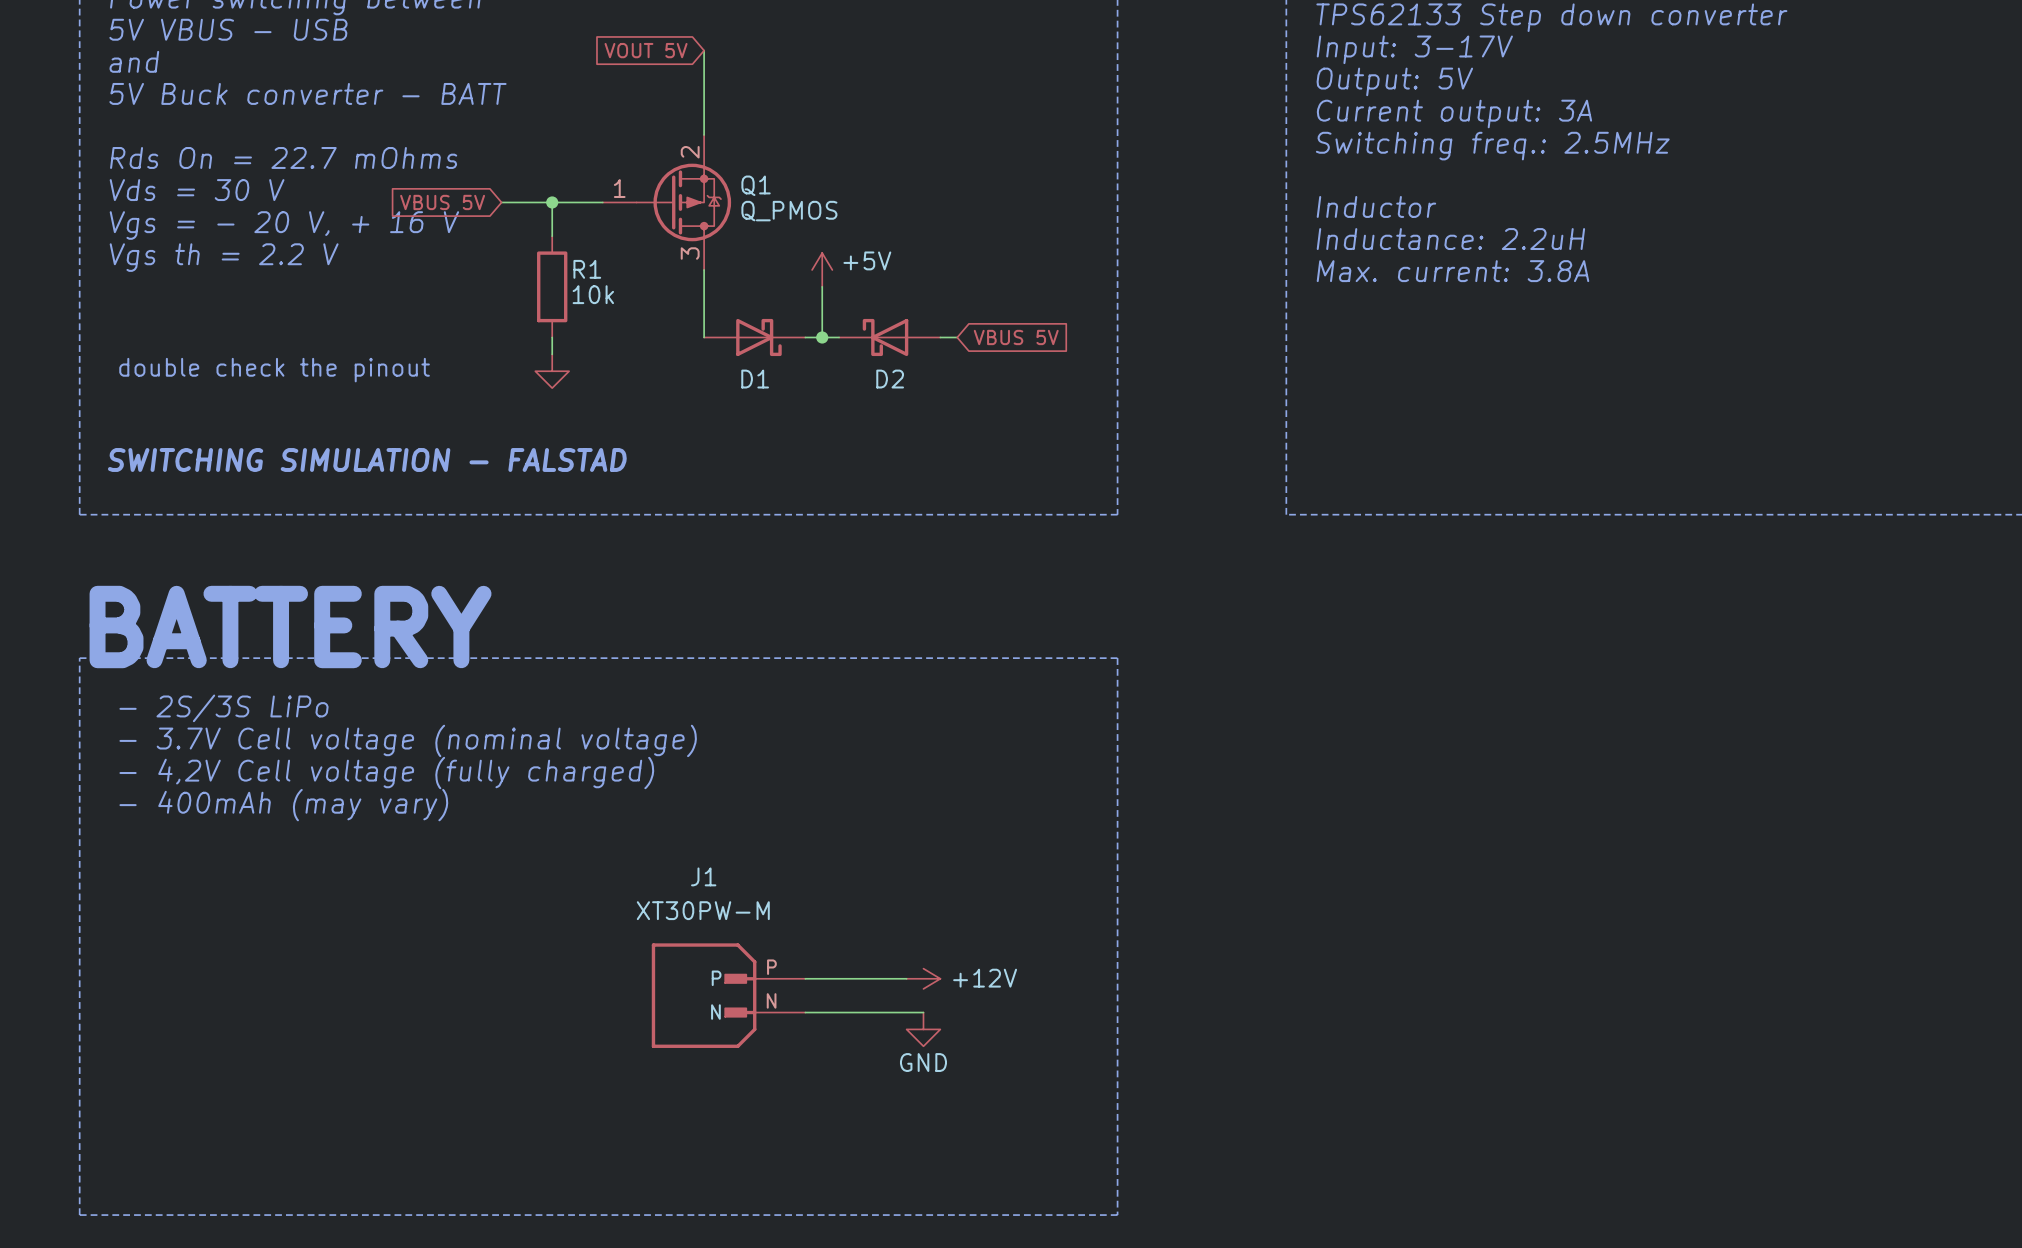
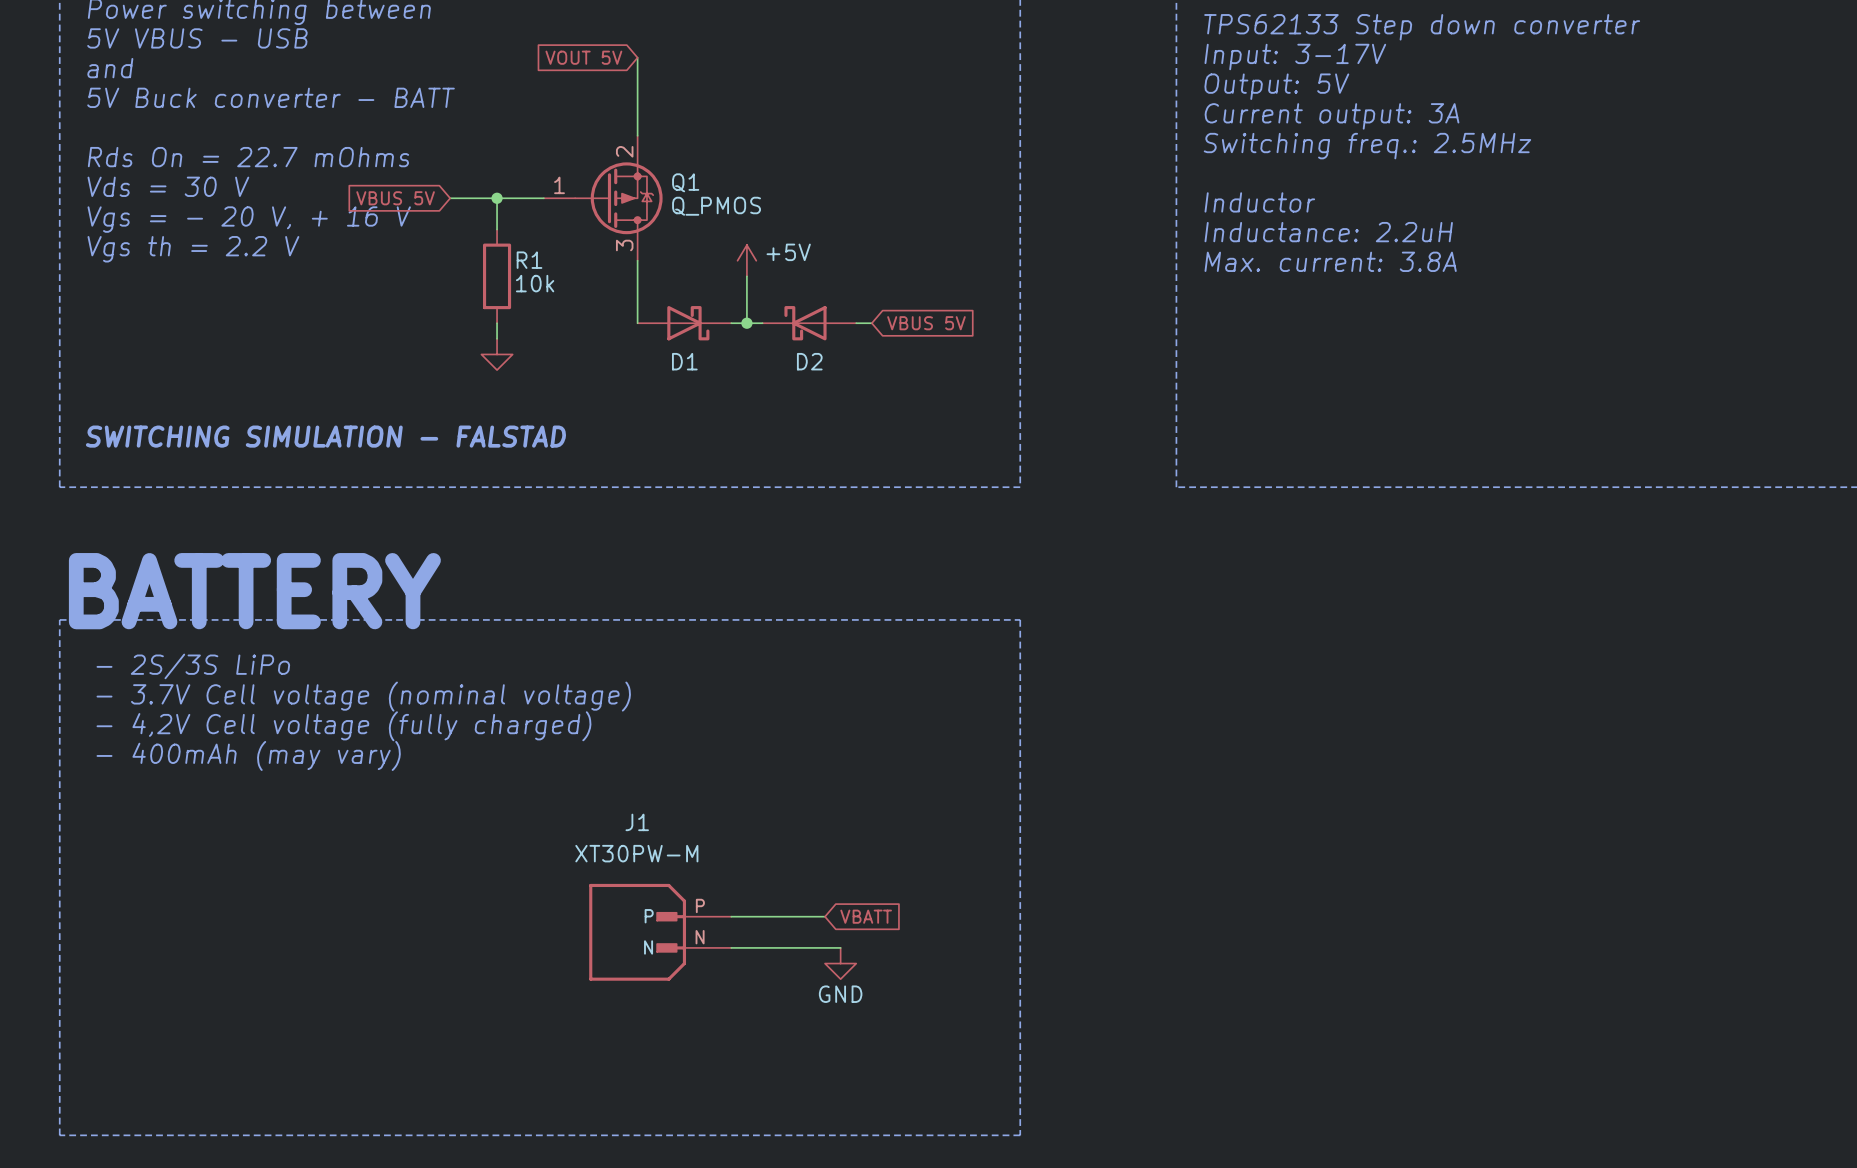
text: double check the pinout (274, 370) -> none
power symbol: +12V (923, 978) -> none
global label: none -> VBATT (866, 916)

